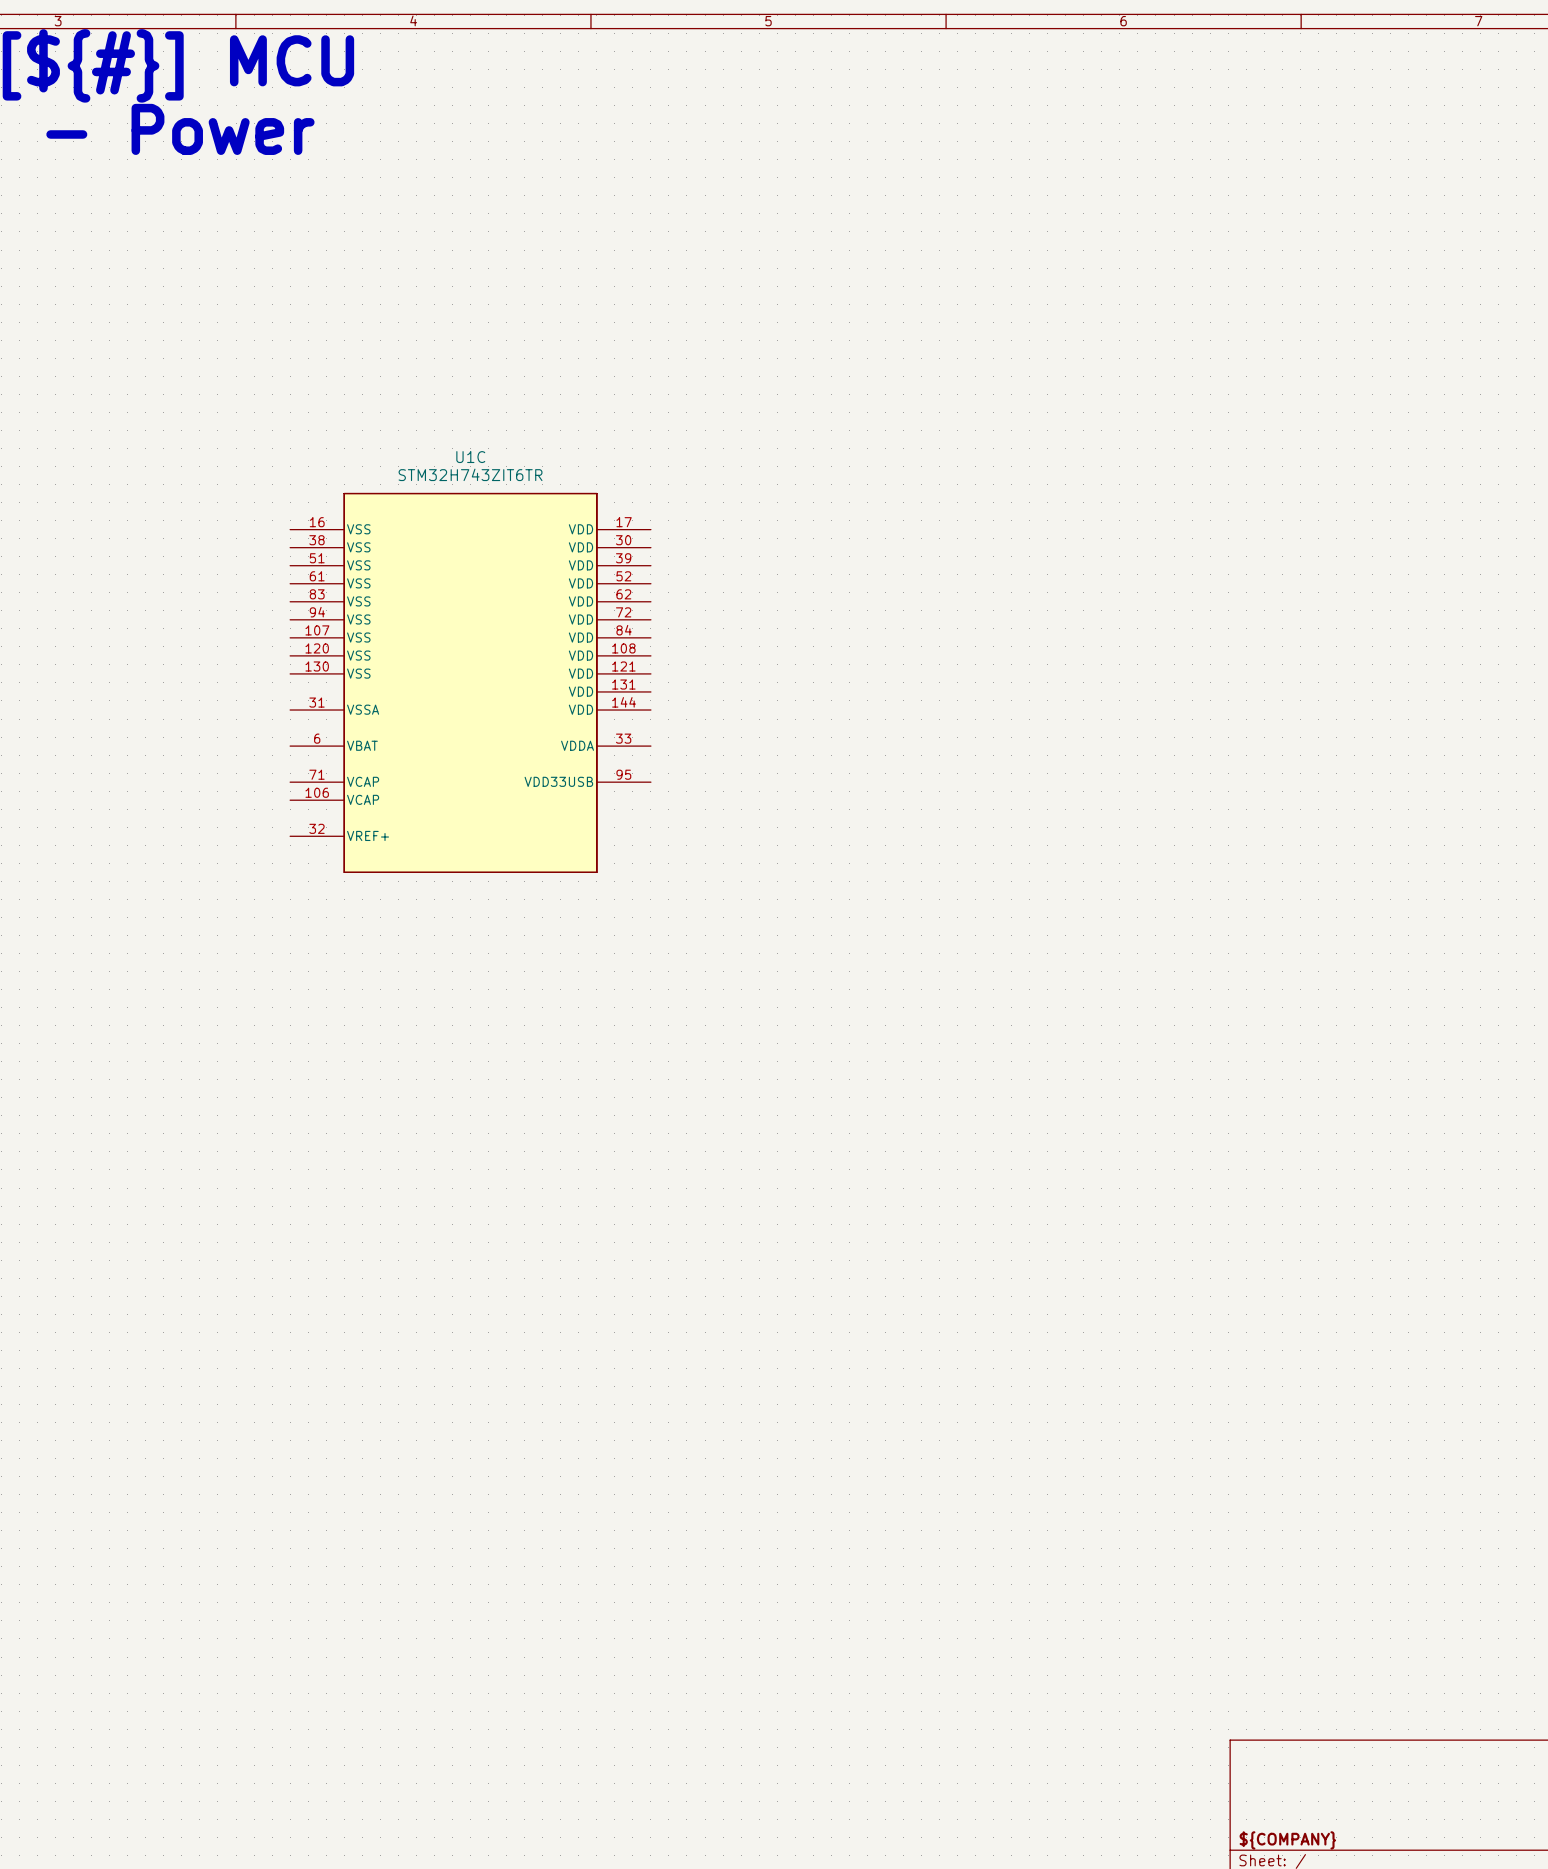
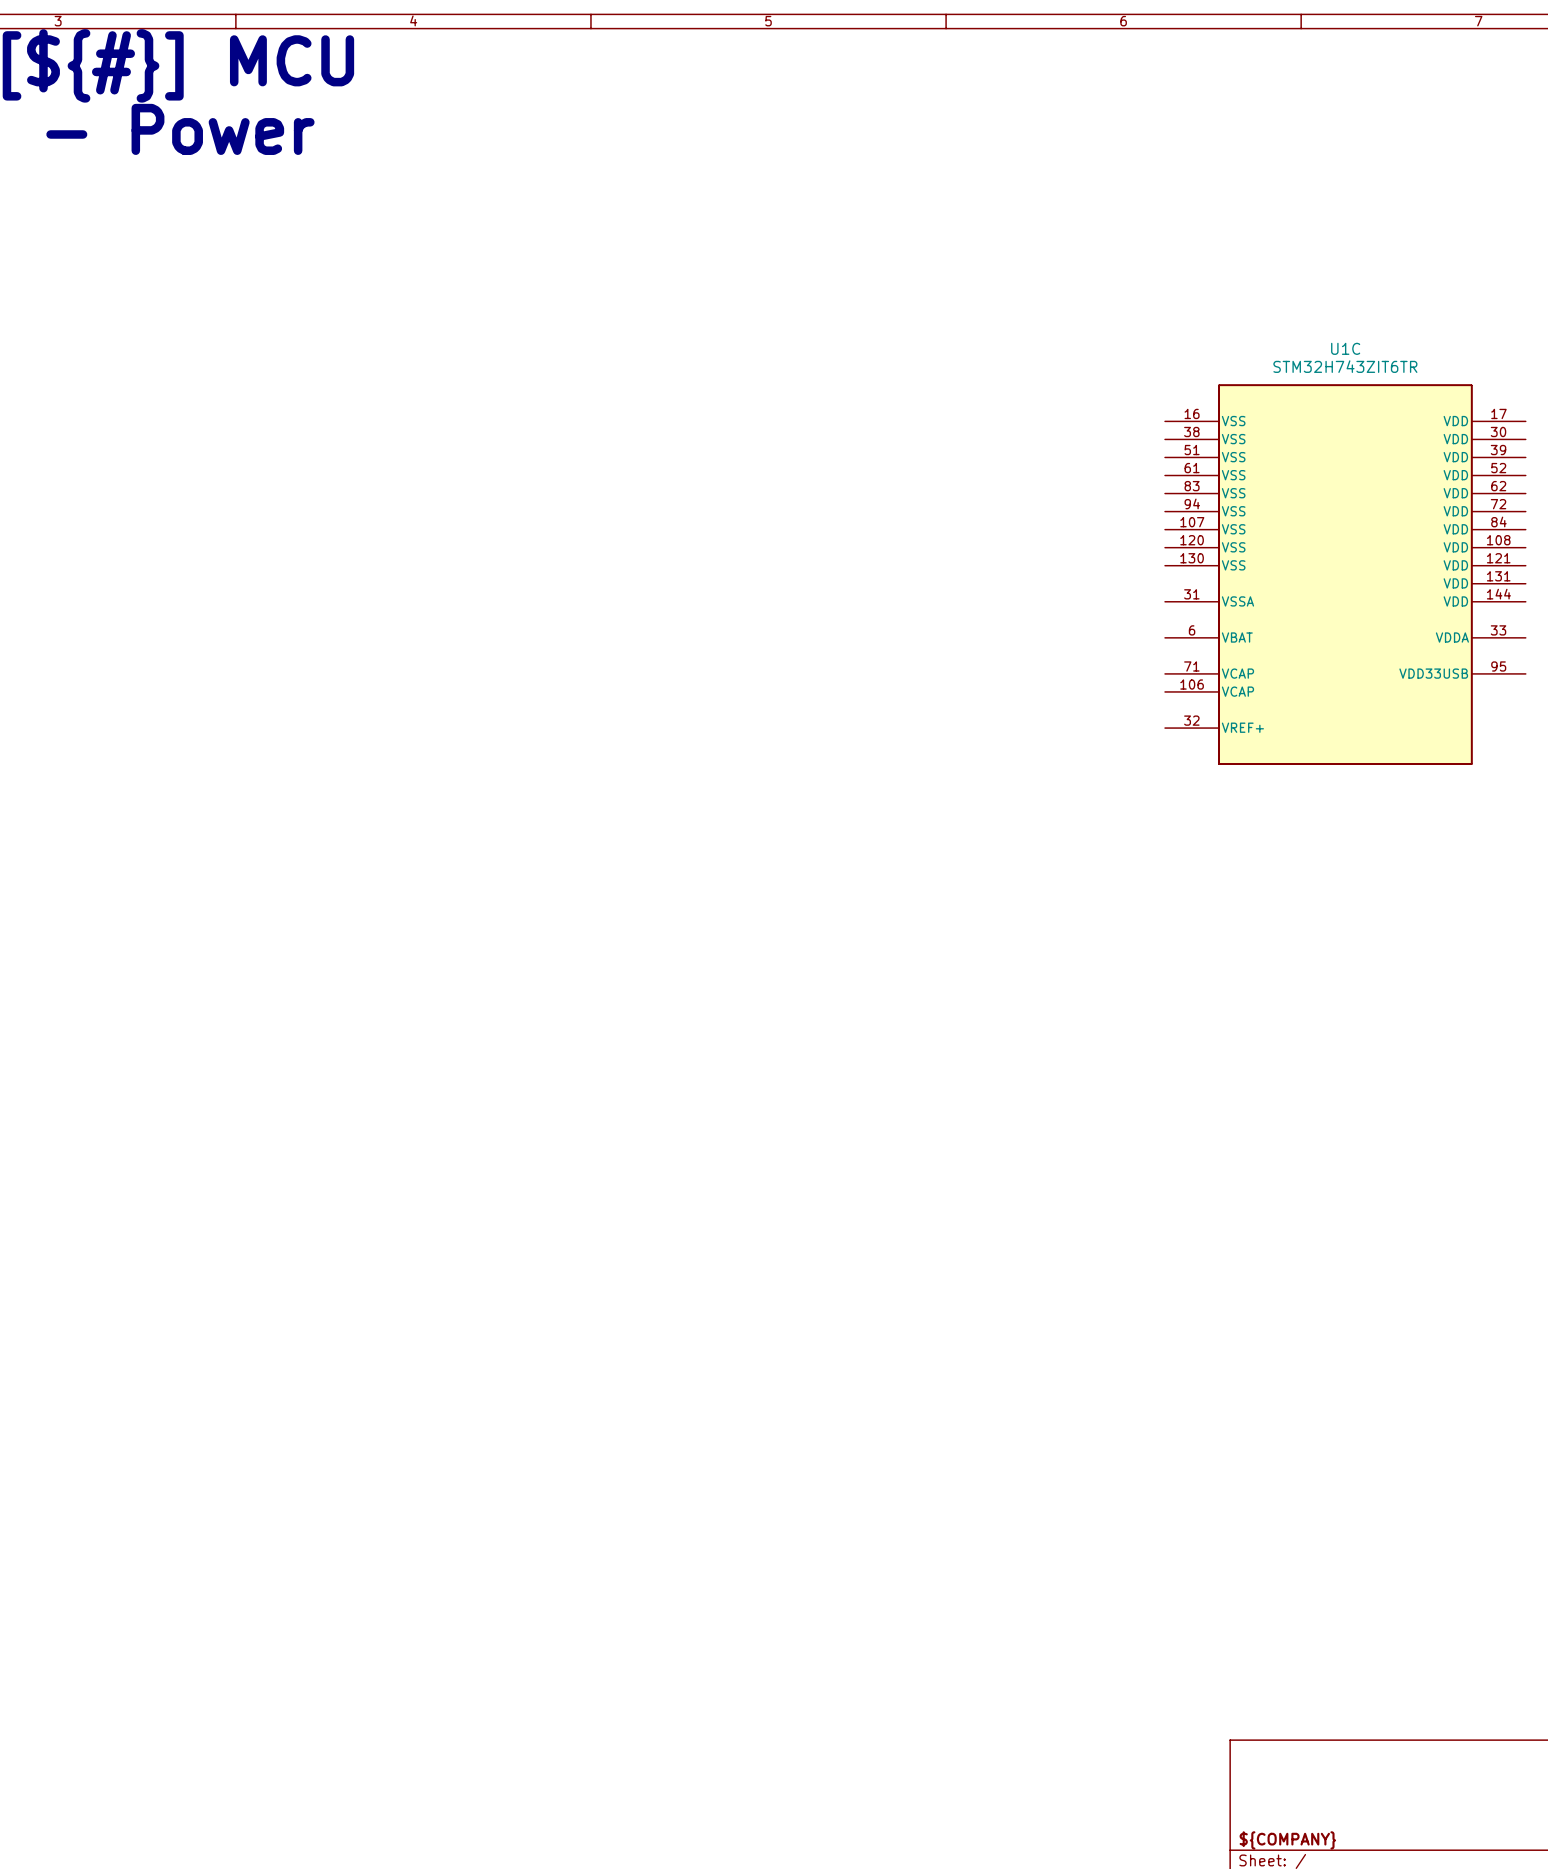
U1C position: (470, 682) -> (1345, 574)

